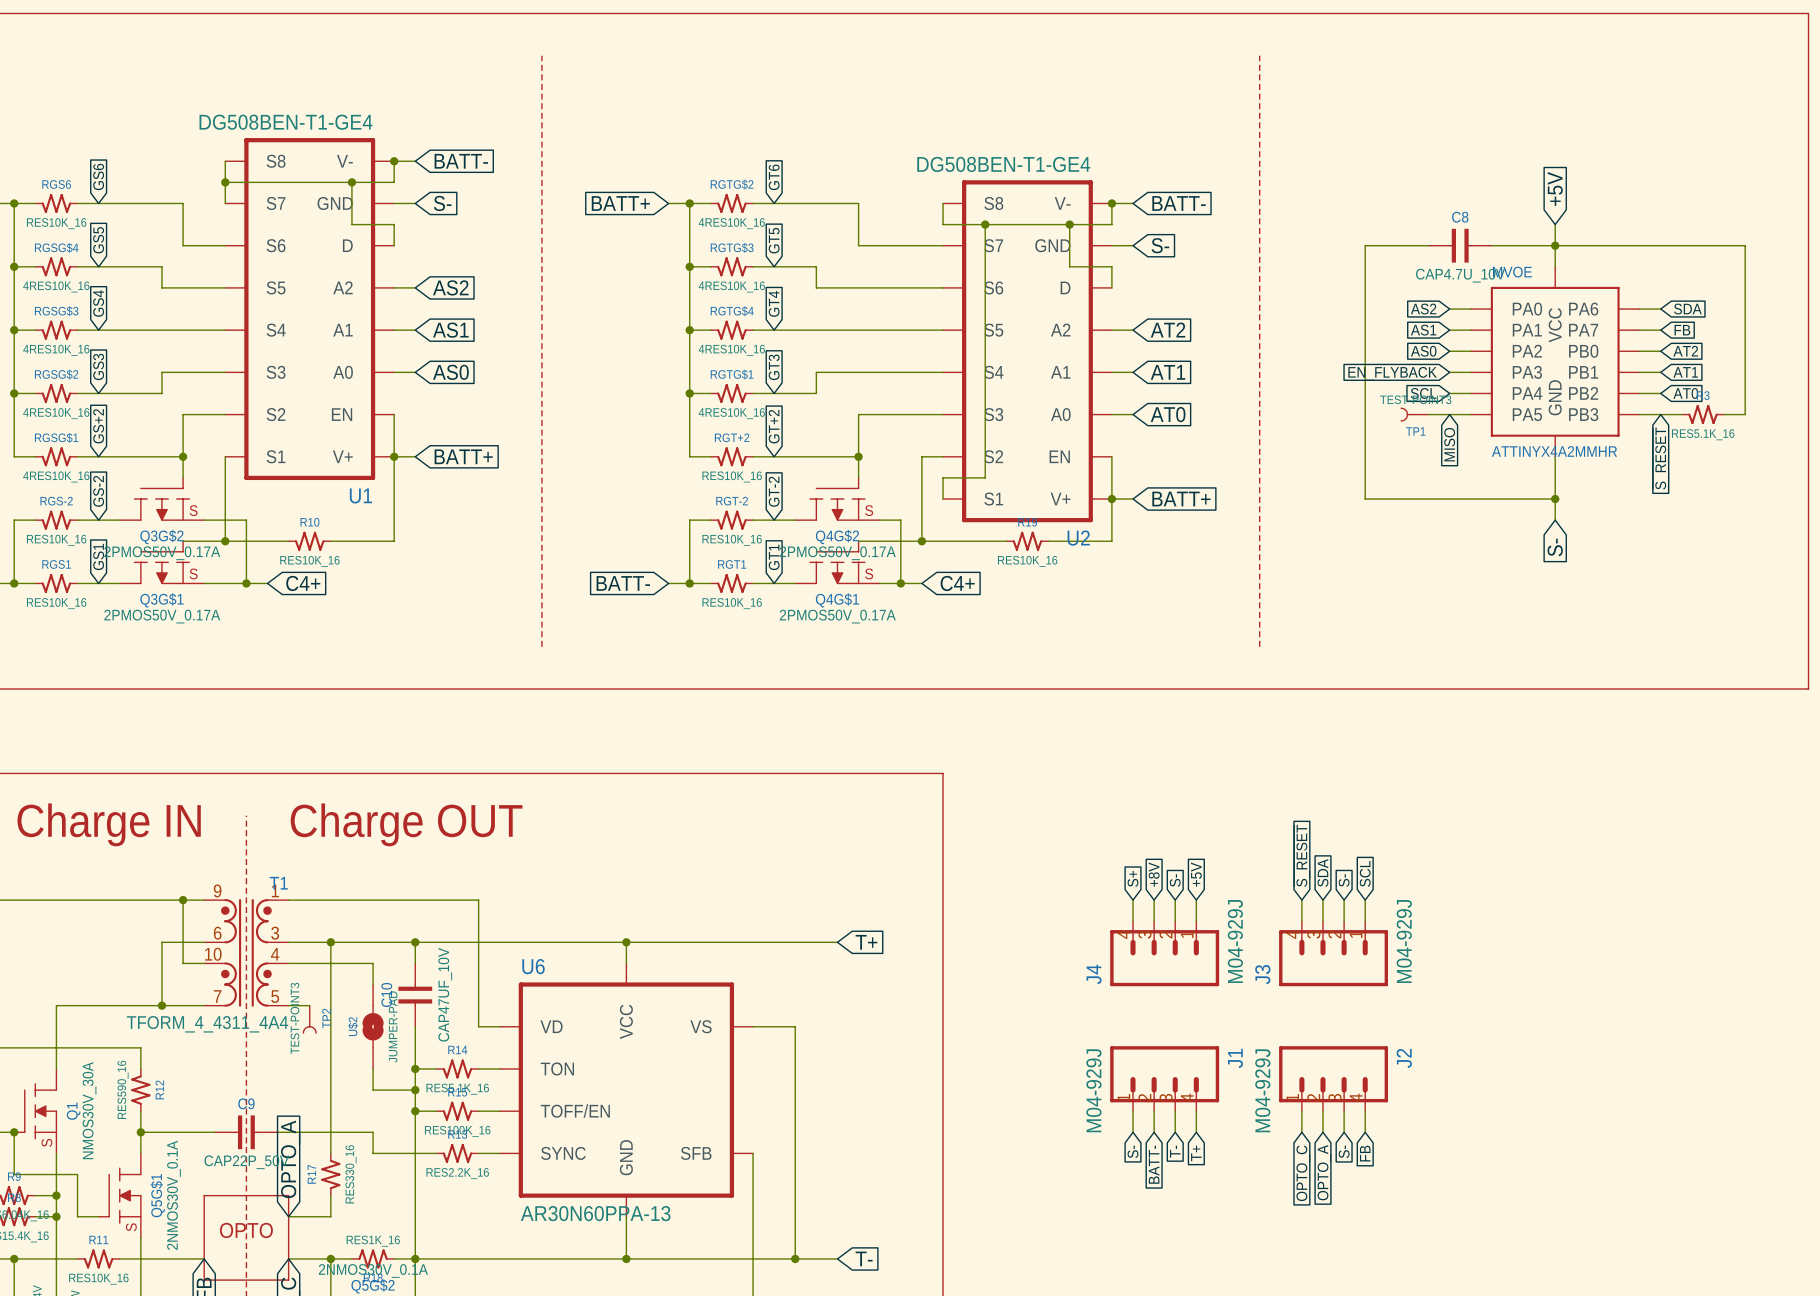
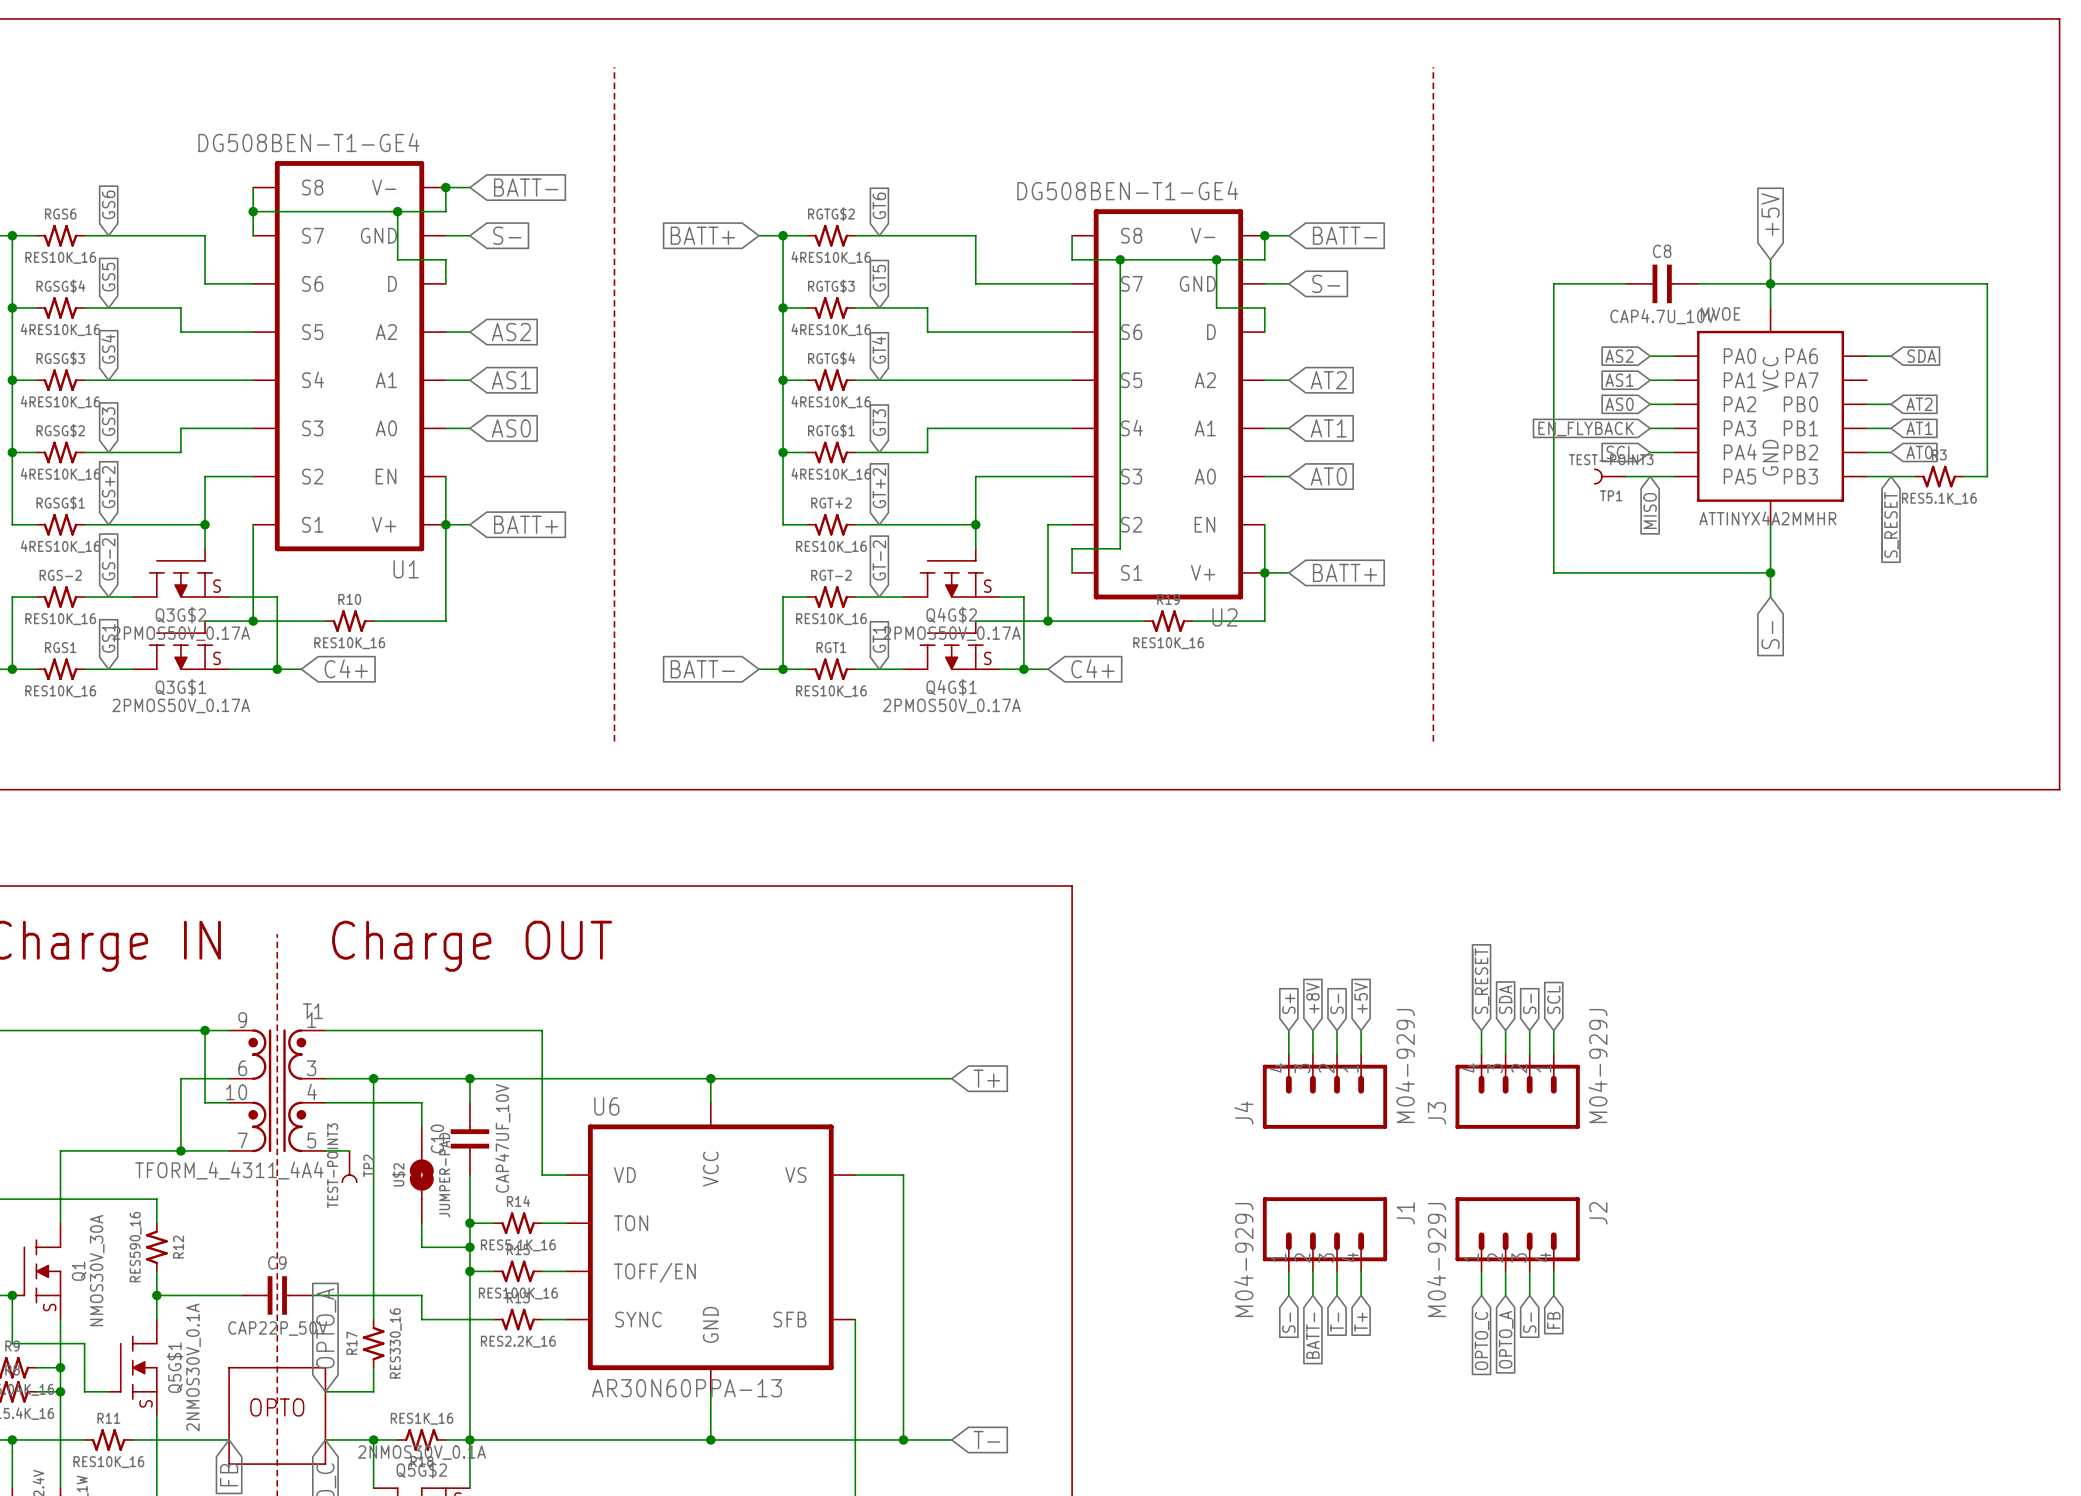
wire: (1639, 330) (1660, 330) -> none
global label: FB (1682, 330) -> none

